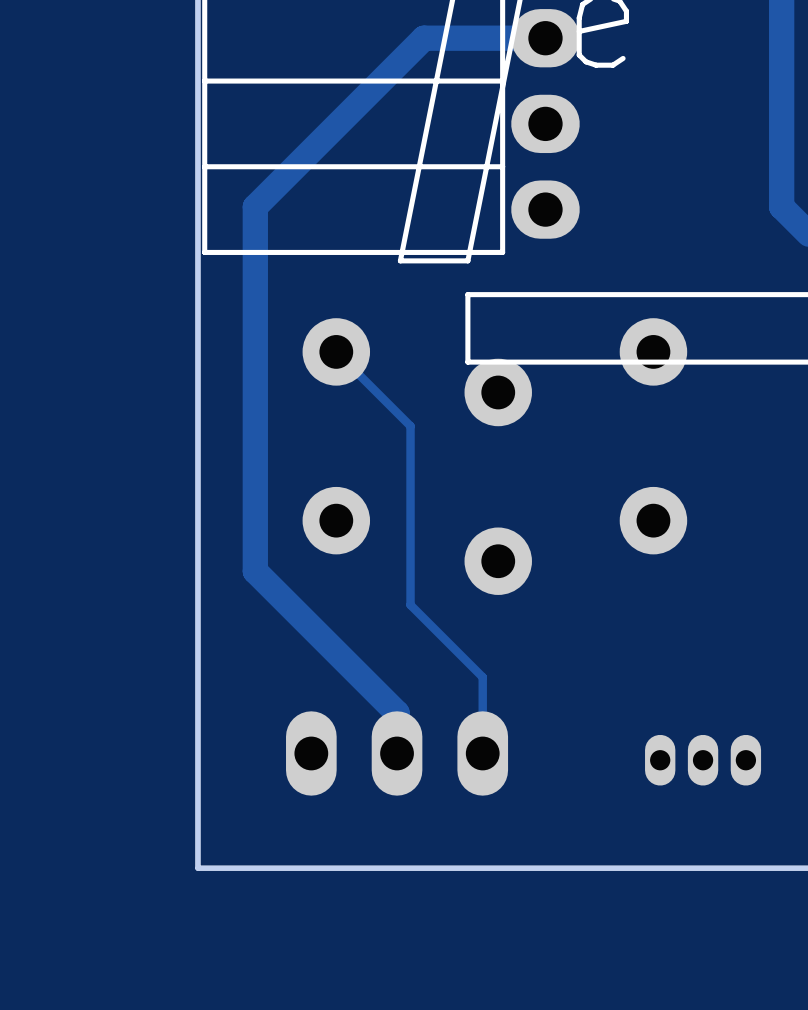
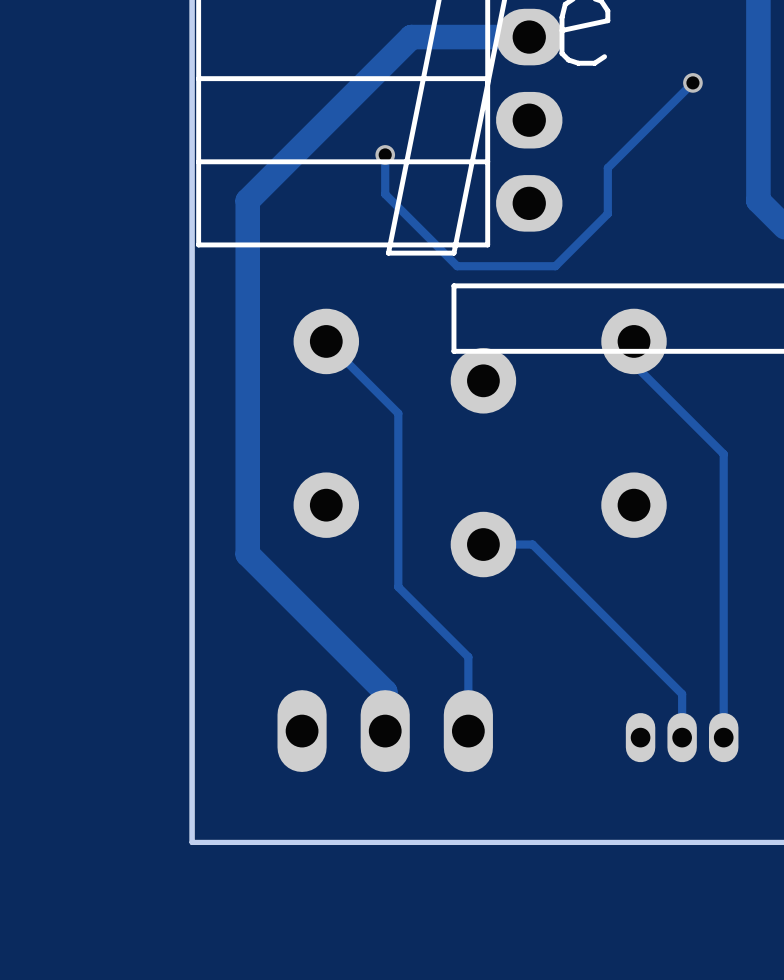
track: none -> (692, 82) (607, 168) (607, 213) (555, 266) (457, 266) (385, 194) (385, 154)
via: none -> (692, 82)
via: none -> (385, 154)
track: none -> (634, 341) (634, 364) (723, 454) (723, 737)
track: none -> (483, 544) (532, 544) (682, 694) (682, 737)

